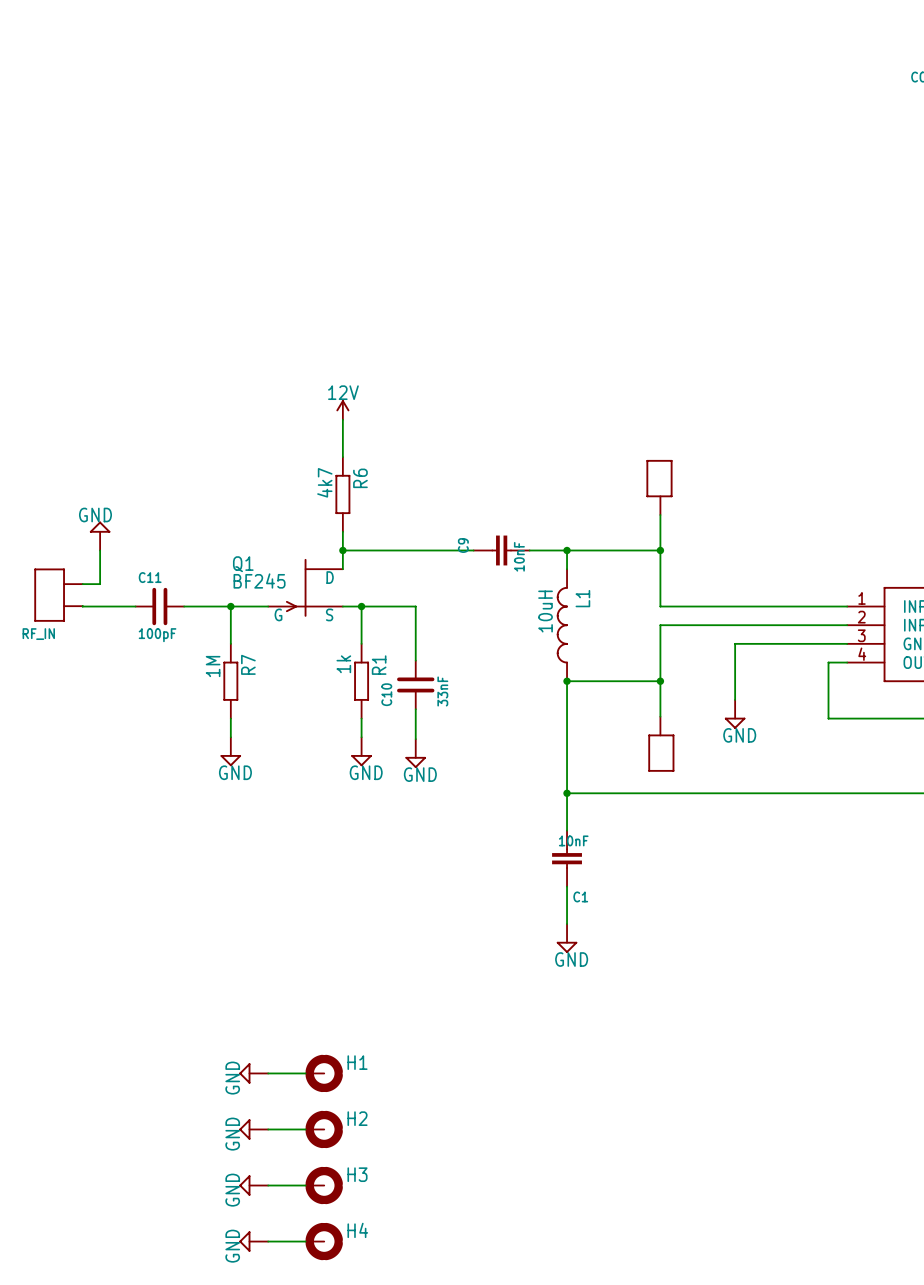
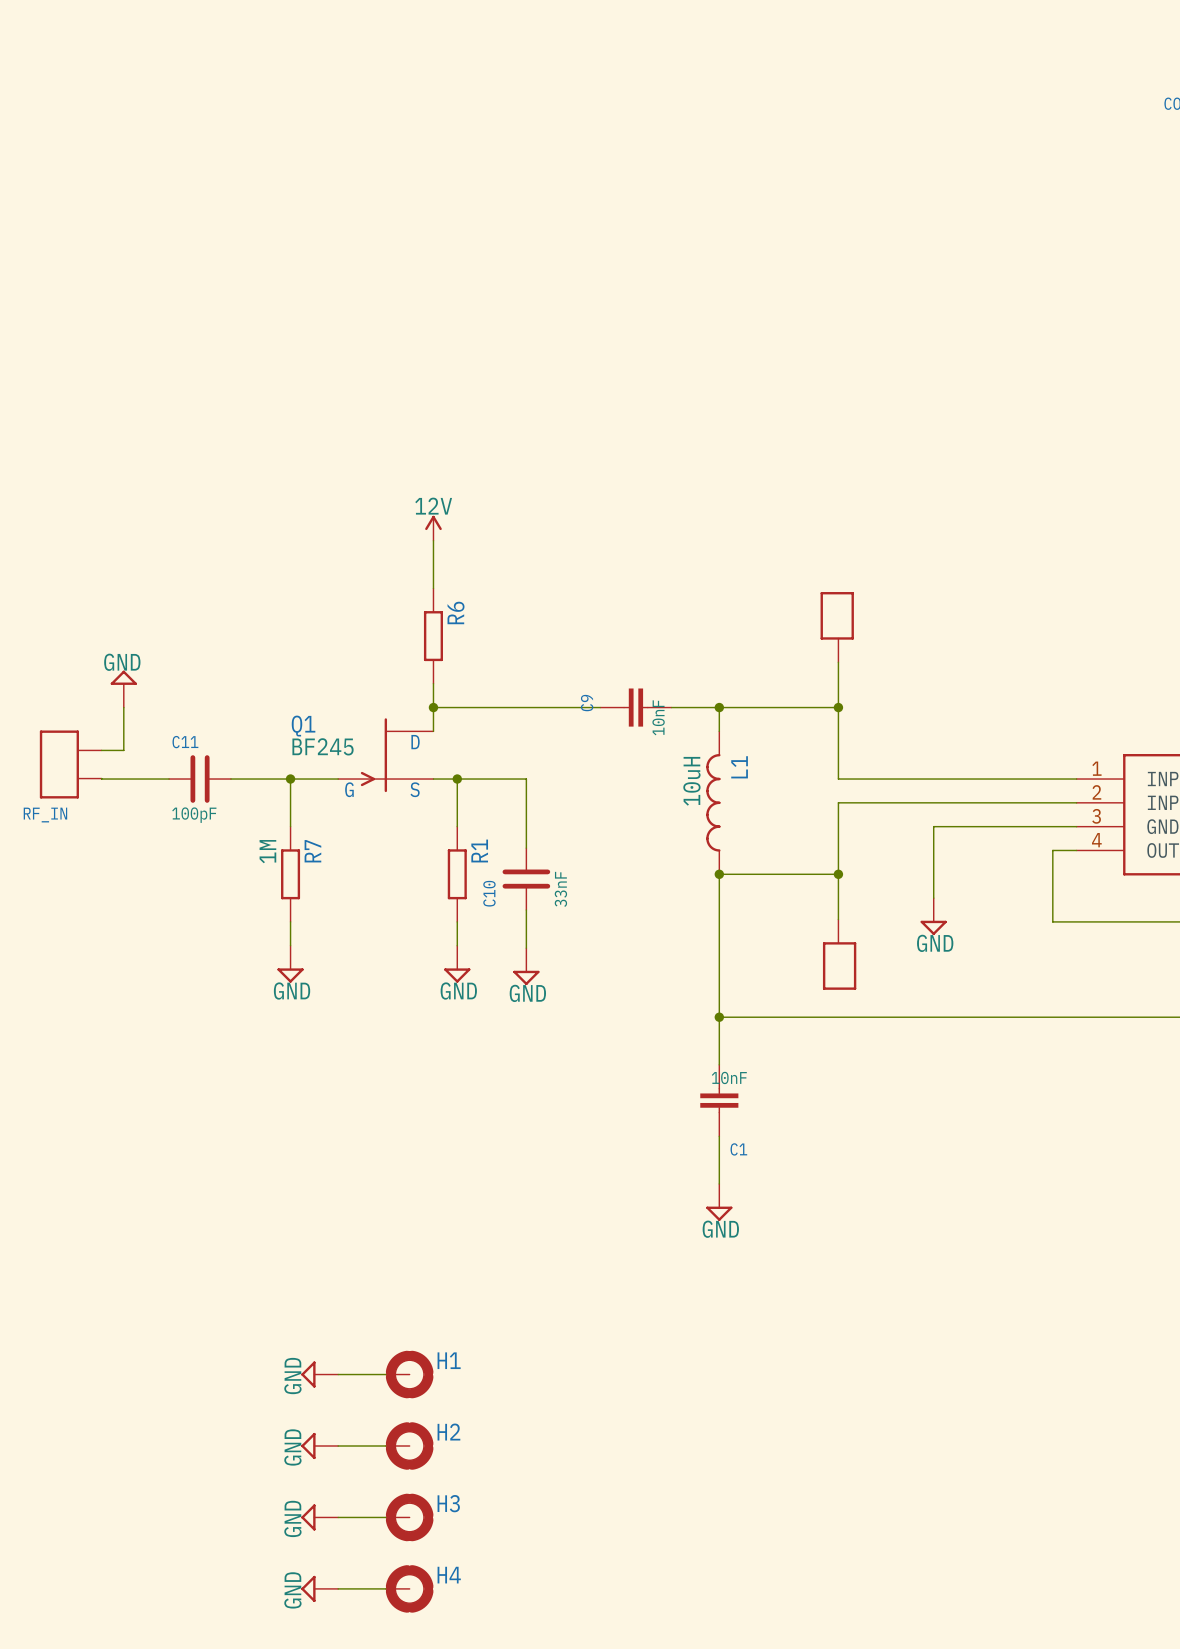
R6 value: 4k7 (324, 482) -> none
R1 value: 1k (343, 664) -> none

